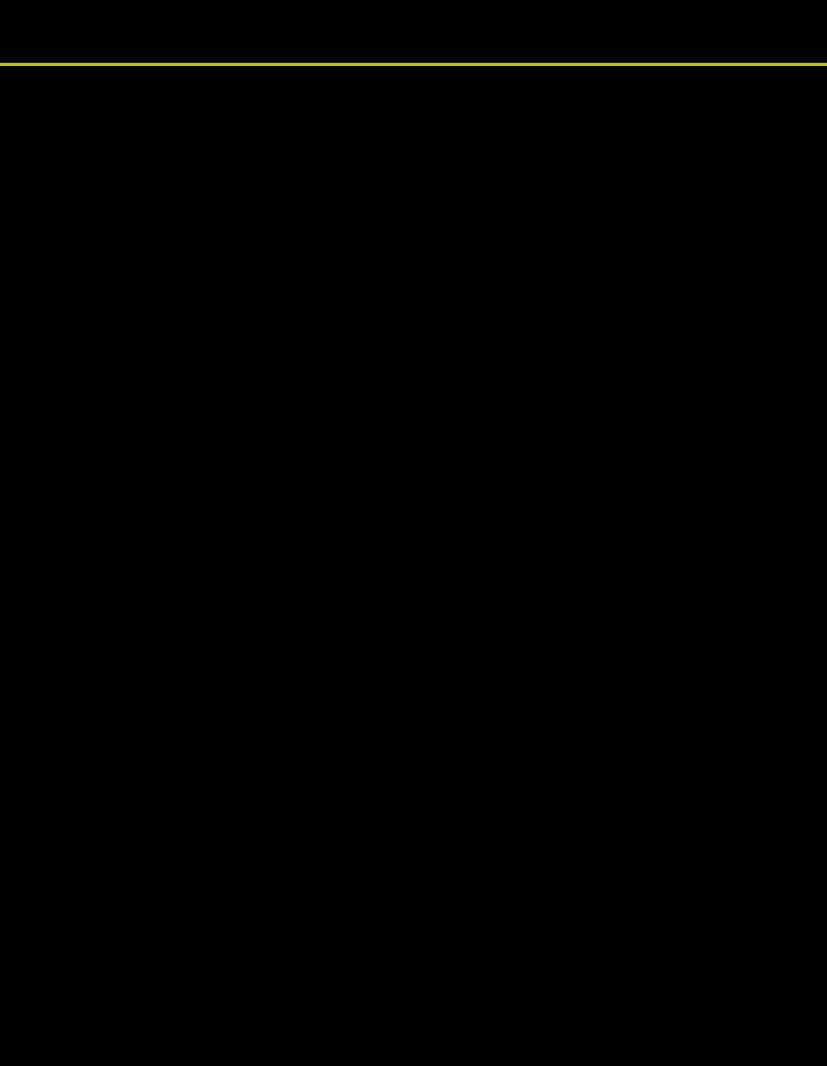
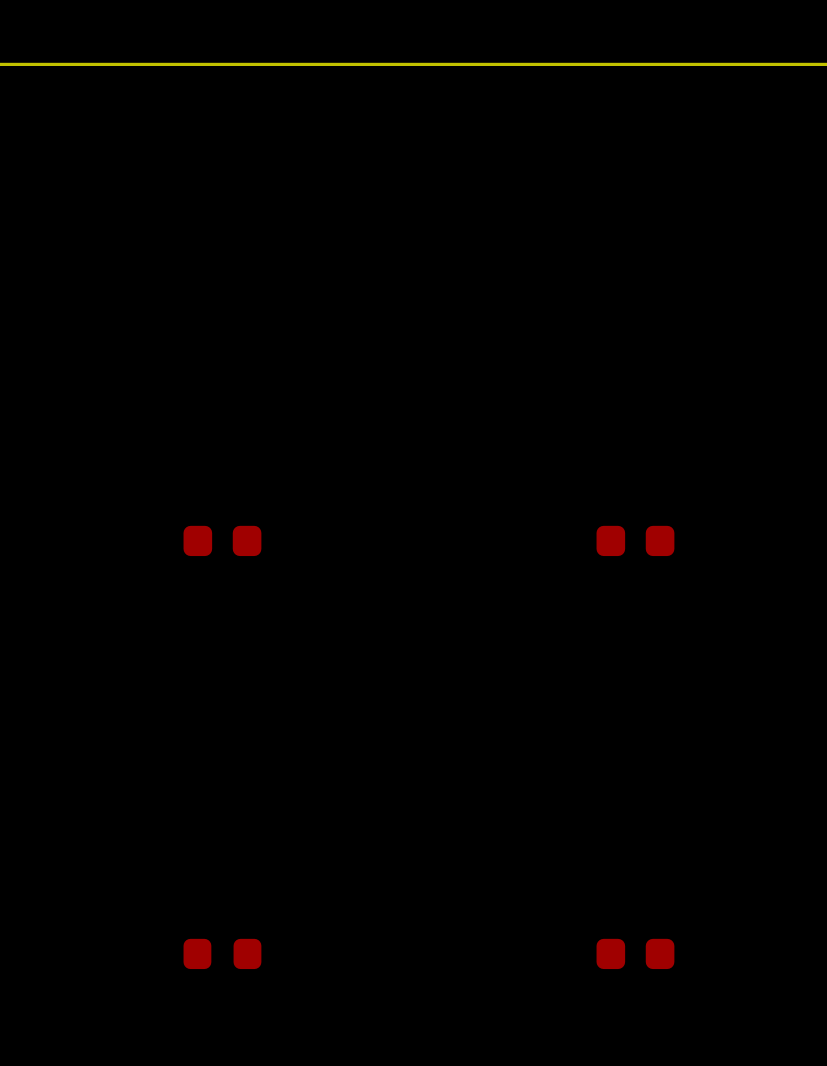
part: none -> (222, 540)
part: none -> (635, 540)
part: none -> (222, 953)
part: none -> (635, 953)

